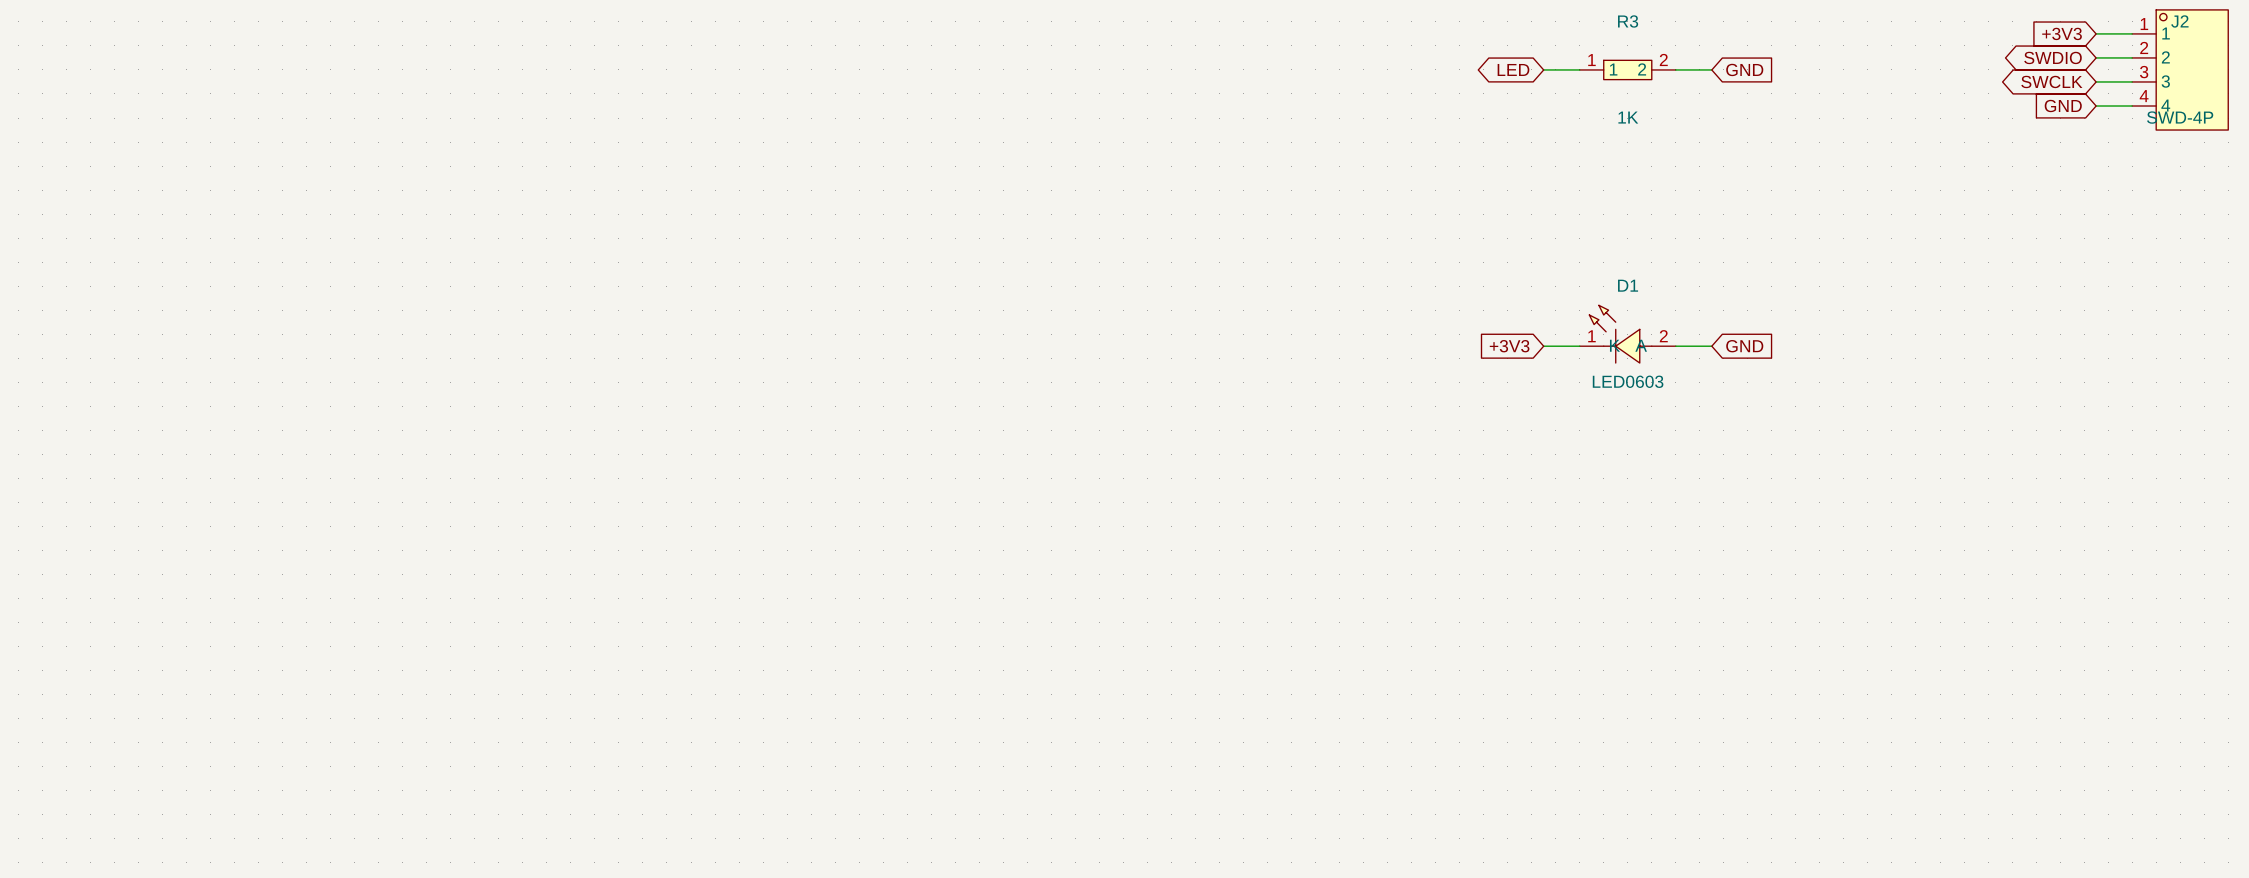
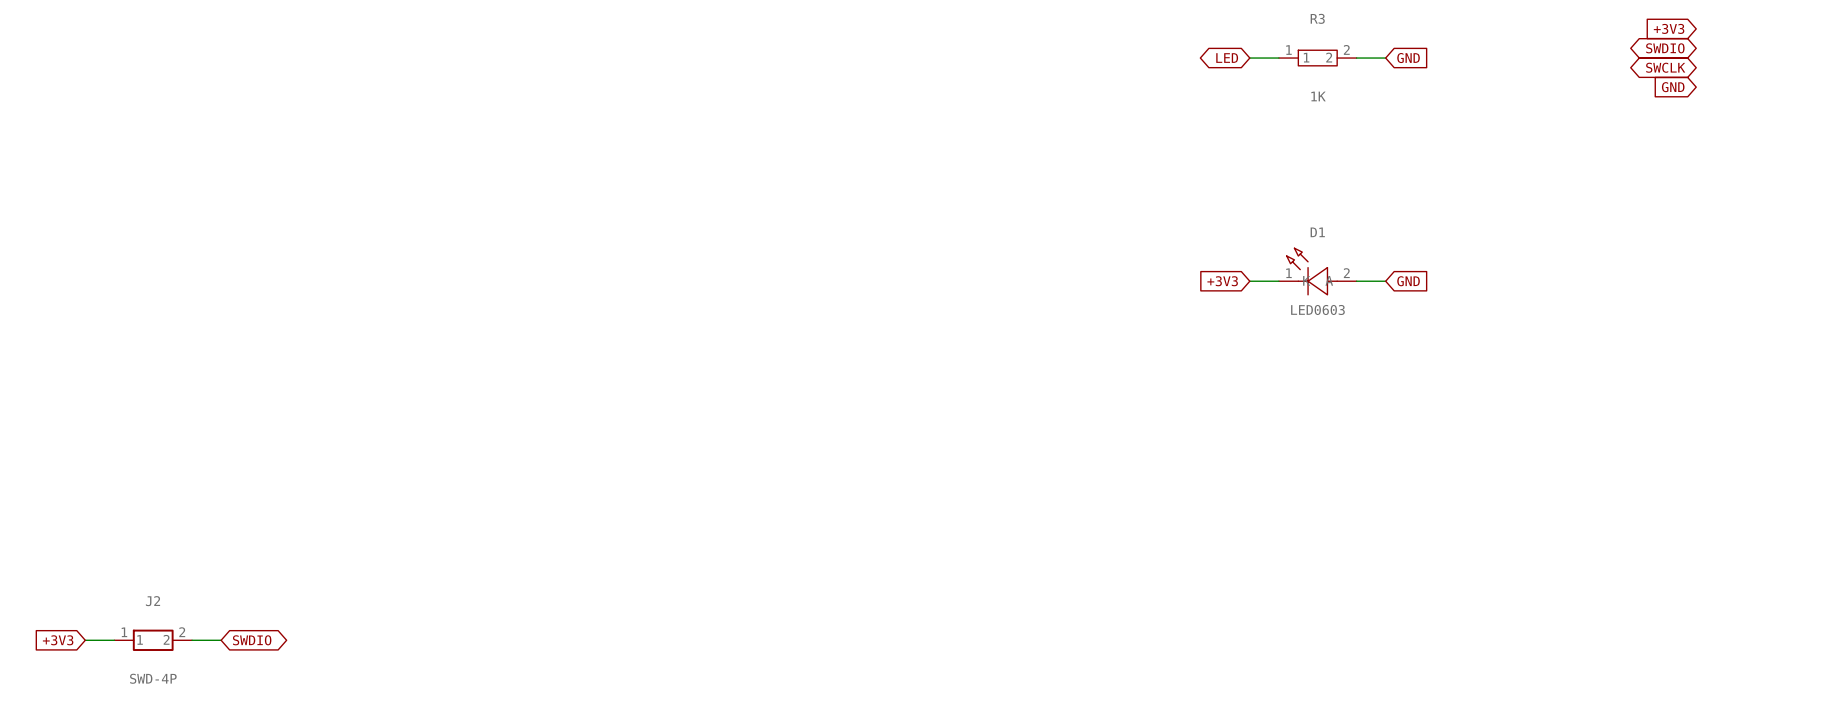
J2 symbol: [2132, 9, 2229, 131] -> [114, 629, 193, 651]
wire: (2096, 33) (2132, 33) -> none
wire: (2096, 57) (2132, 57) -> none
wire: (2096, 81) (2132, 81) -> none
wire: (2096, 106) (2132, 106) -> none
global label: none -> +3V3 (58, 640)
wire: none -> (85, 640) (114, 640)
wire: none -> (192, 640) (221, 640)
global label: none -> SWDIO (252, 640)

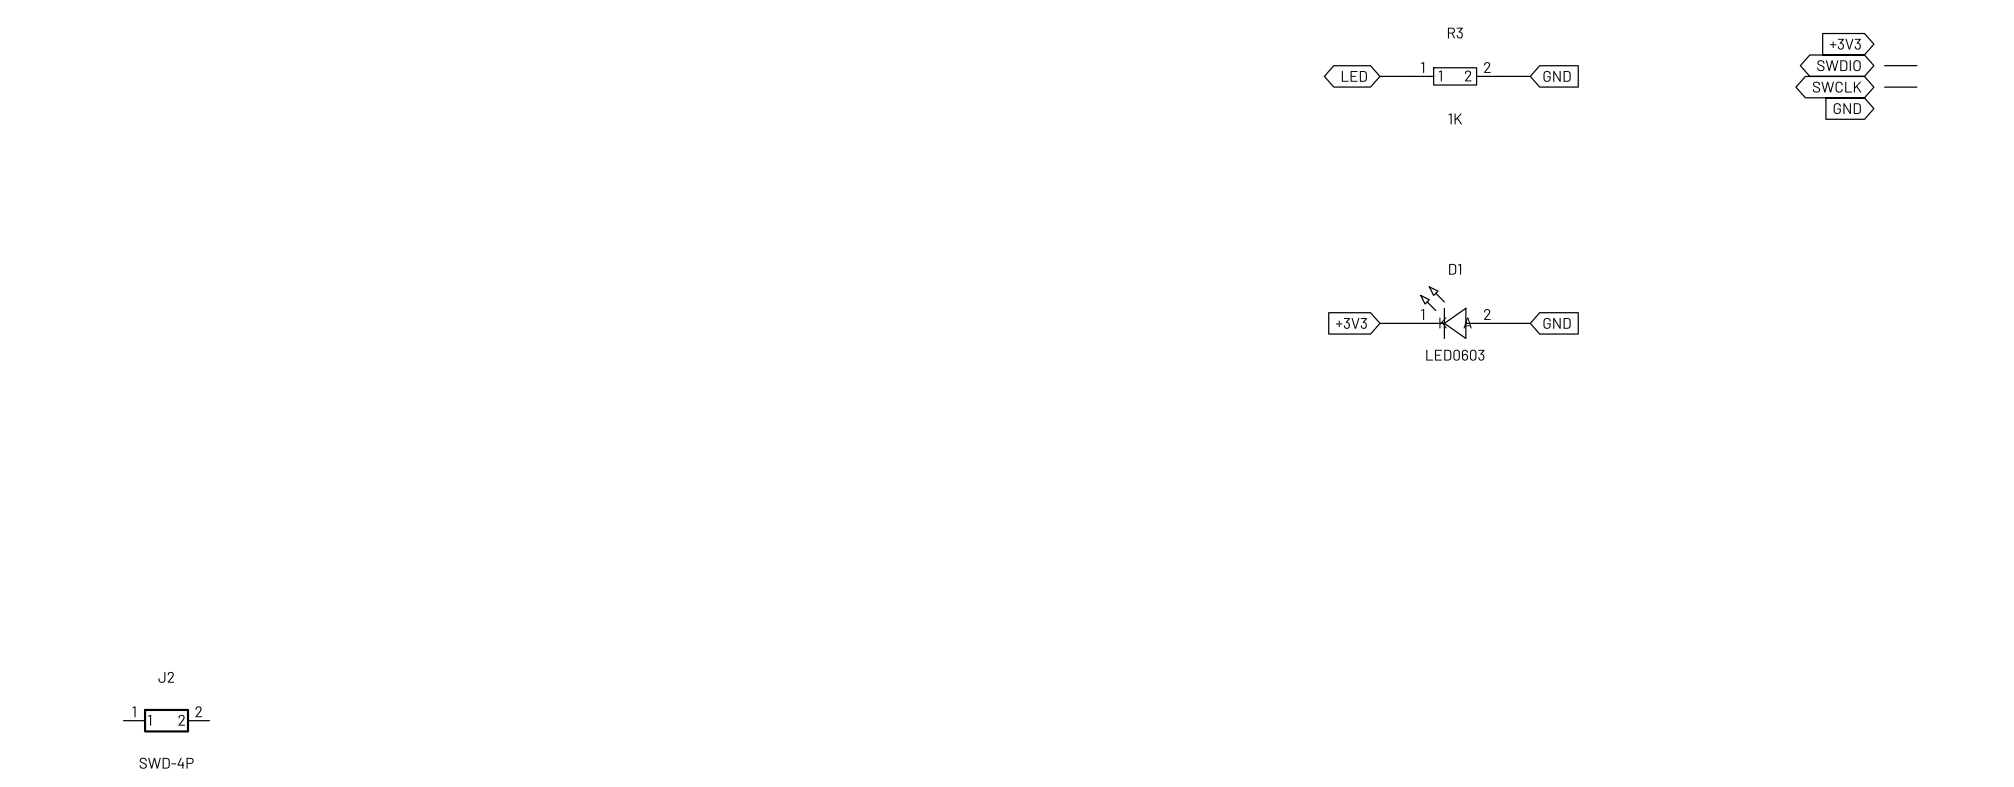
wire: none -> (1884, 65) (1916, 65)
wire: none -> (1884, 87) (1916, 87)
global label: +3V3 (58, 640) -> none
wire: (85, 640) (114, 640) -> none
wire: (192, 640) (221, 640) -> none
global label: SWDIO (252, 640) -> none

